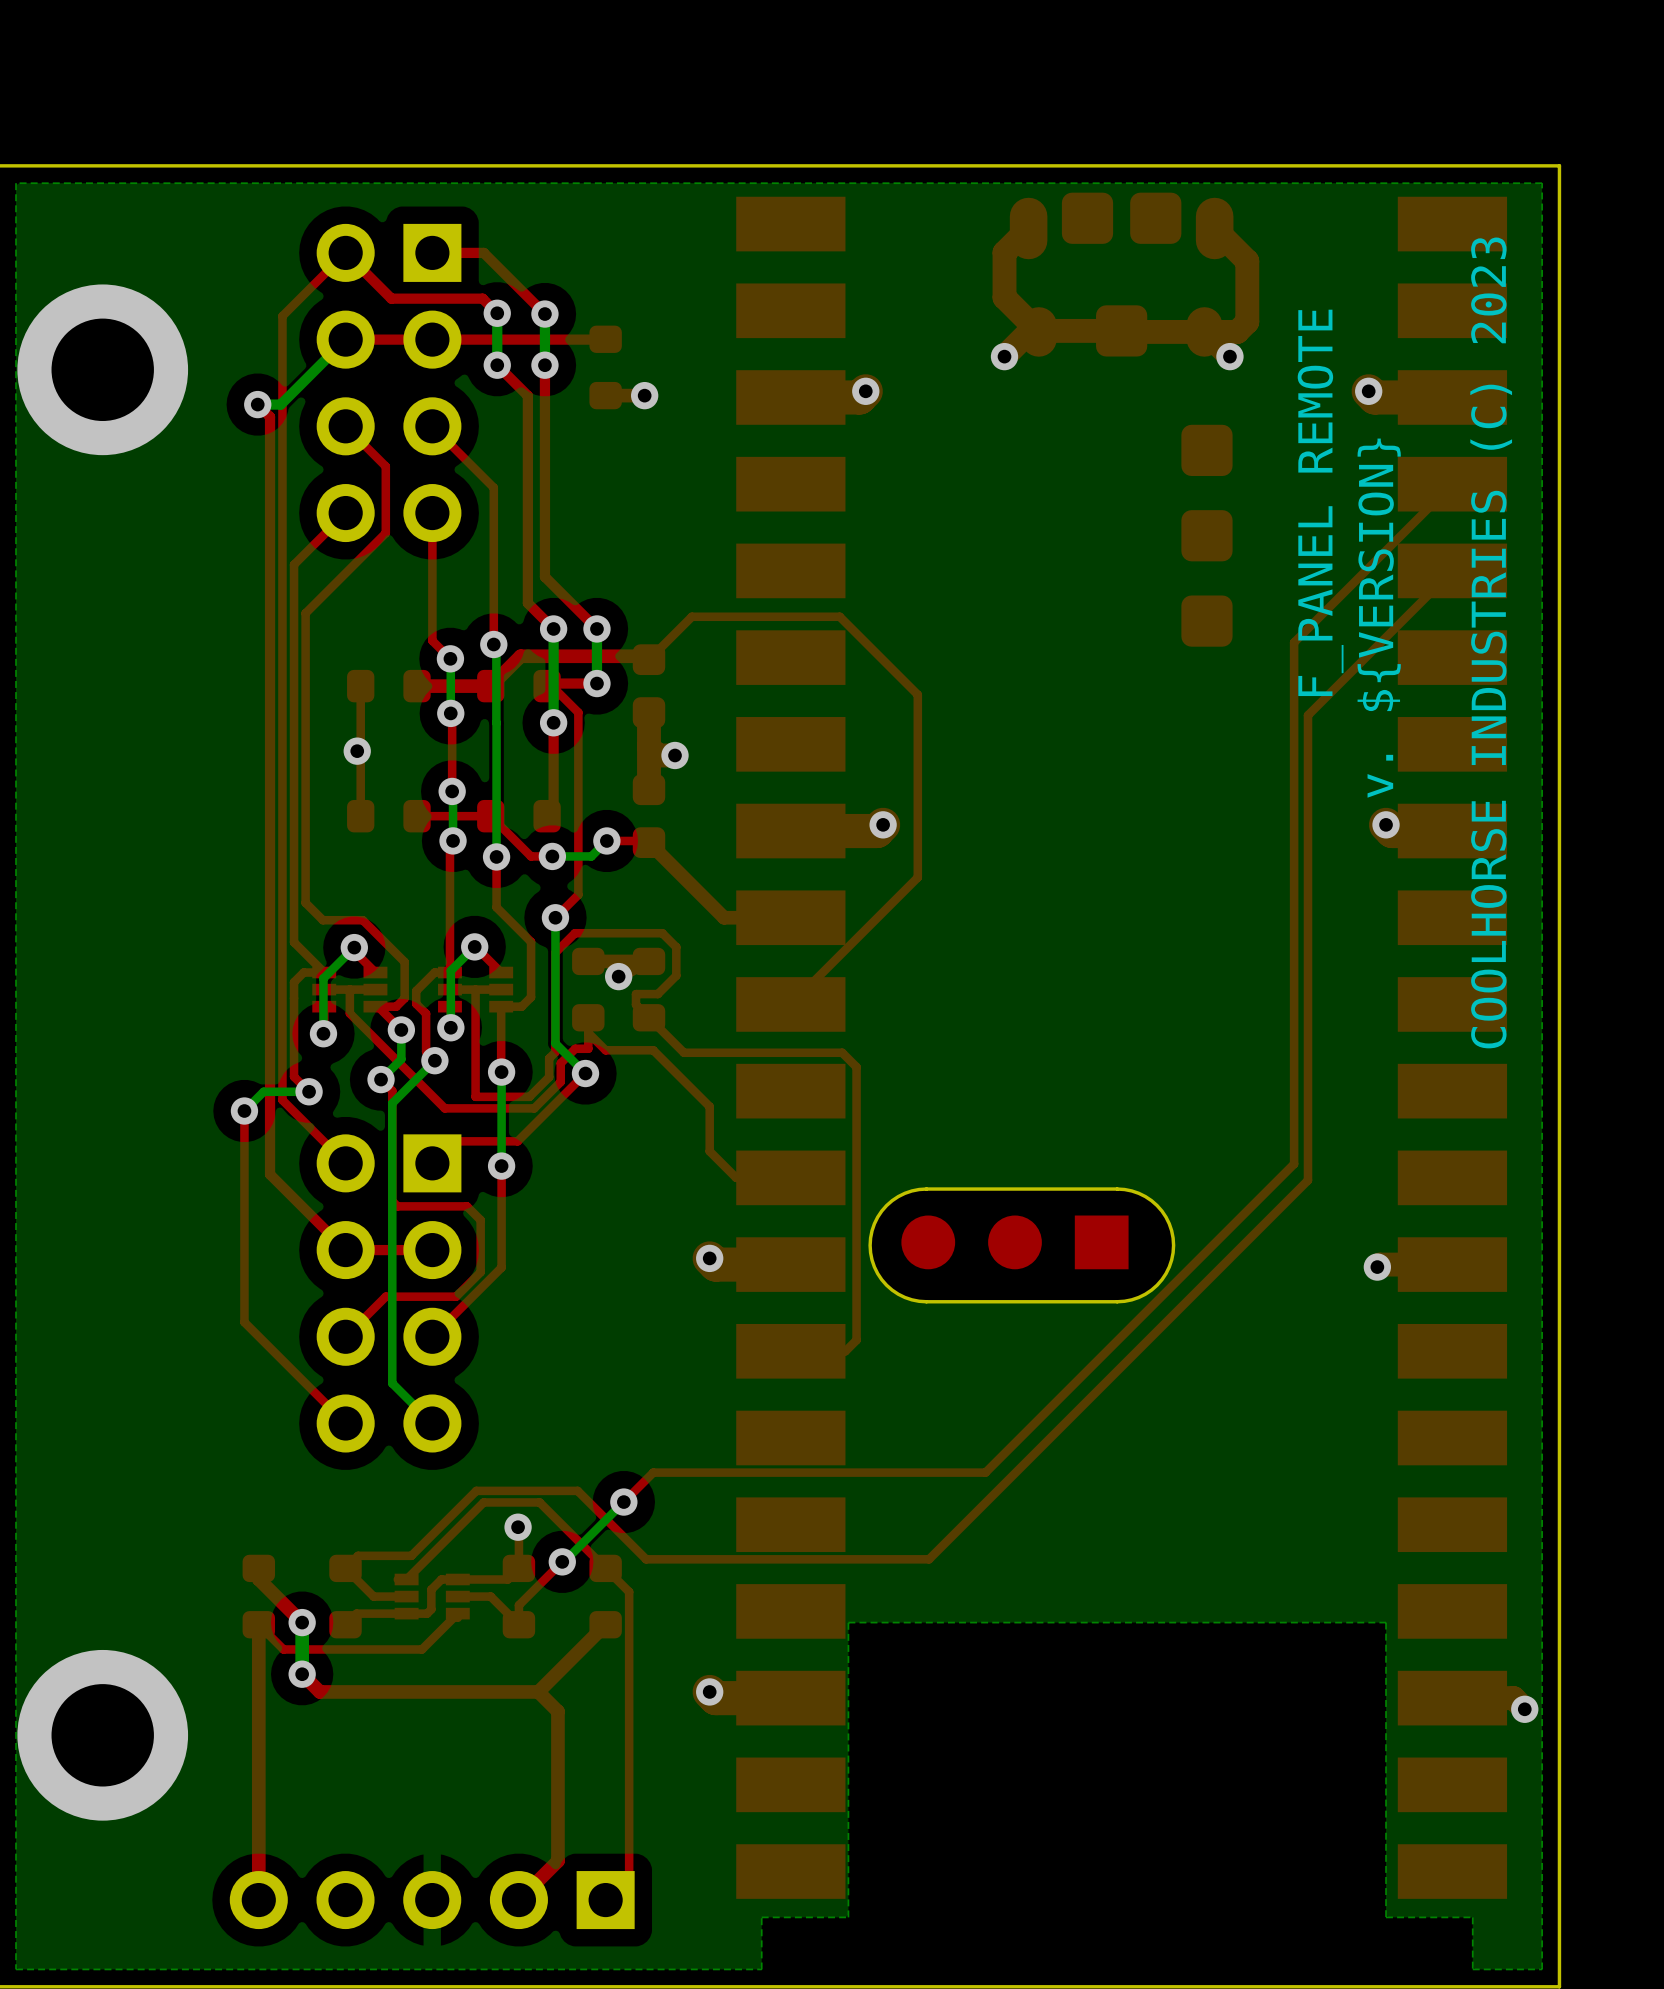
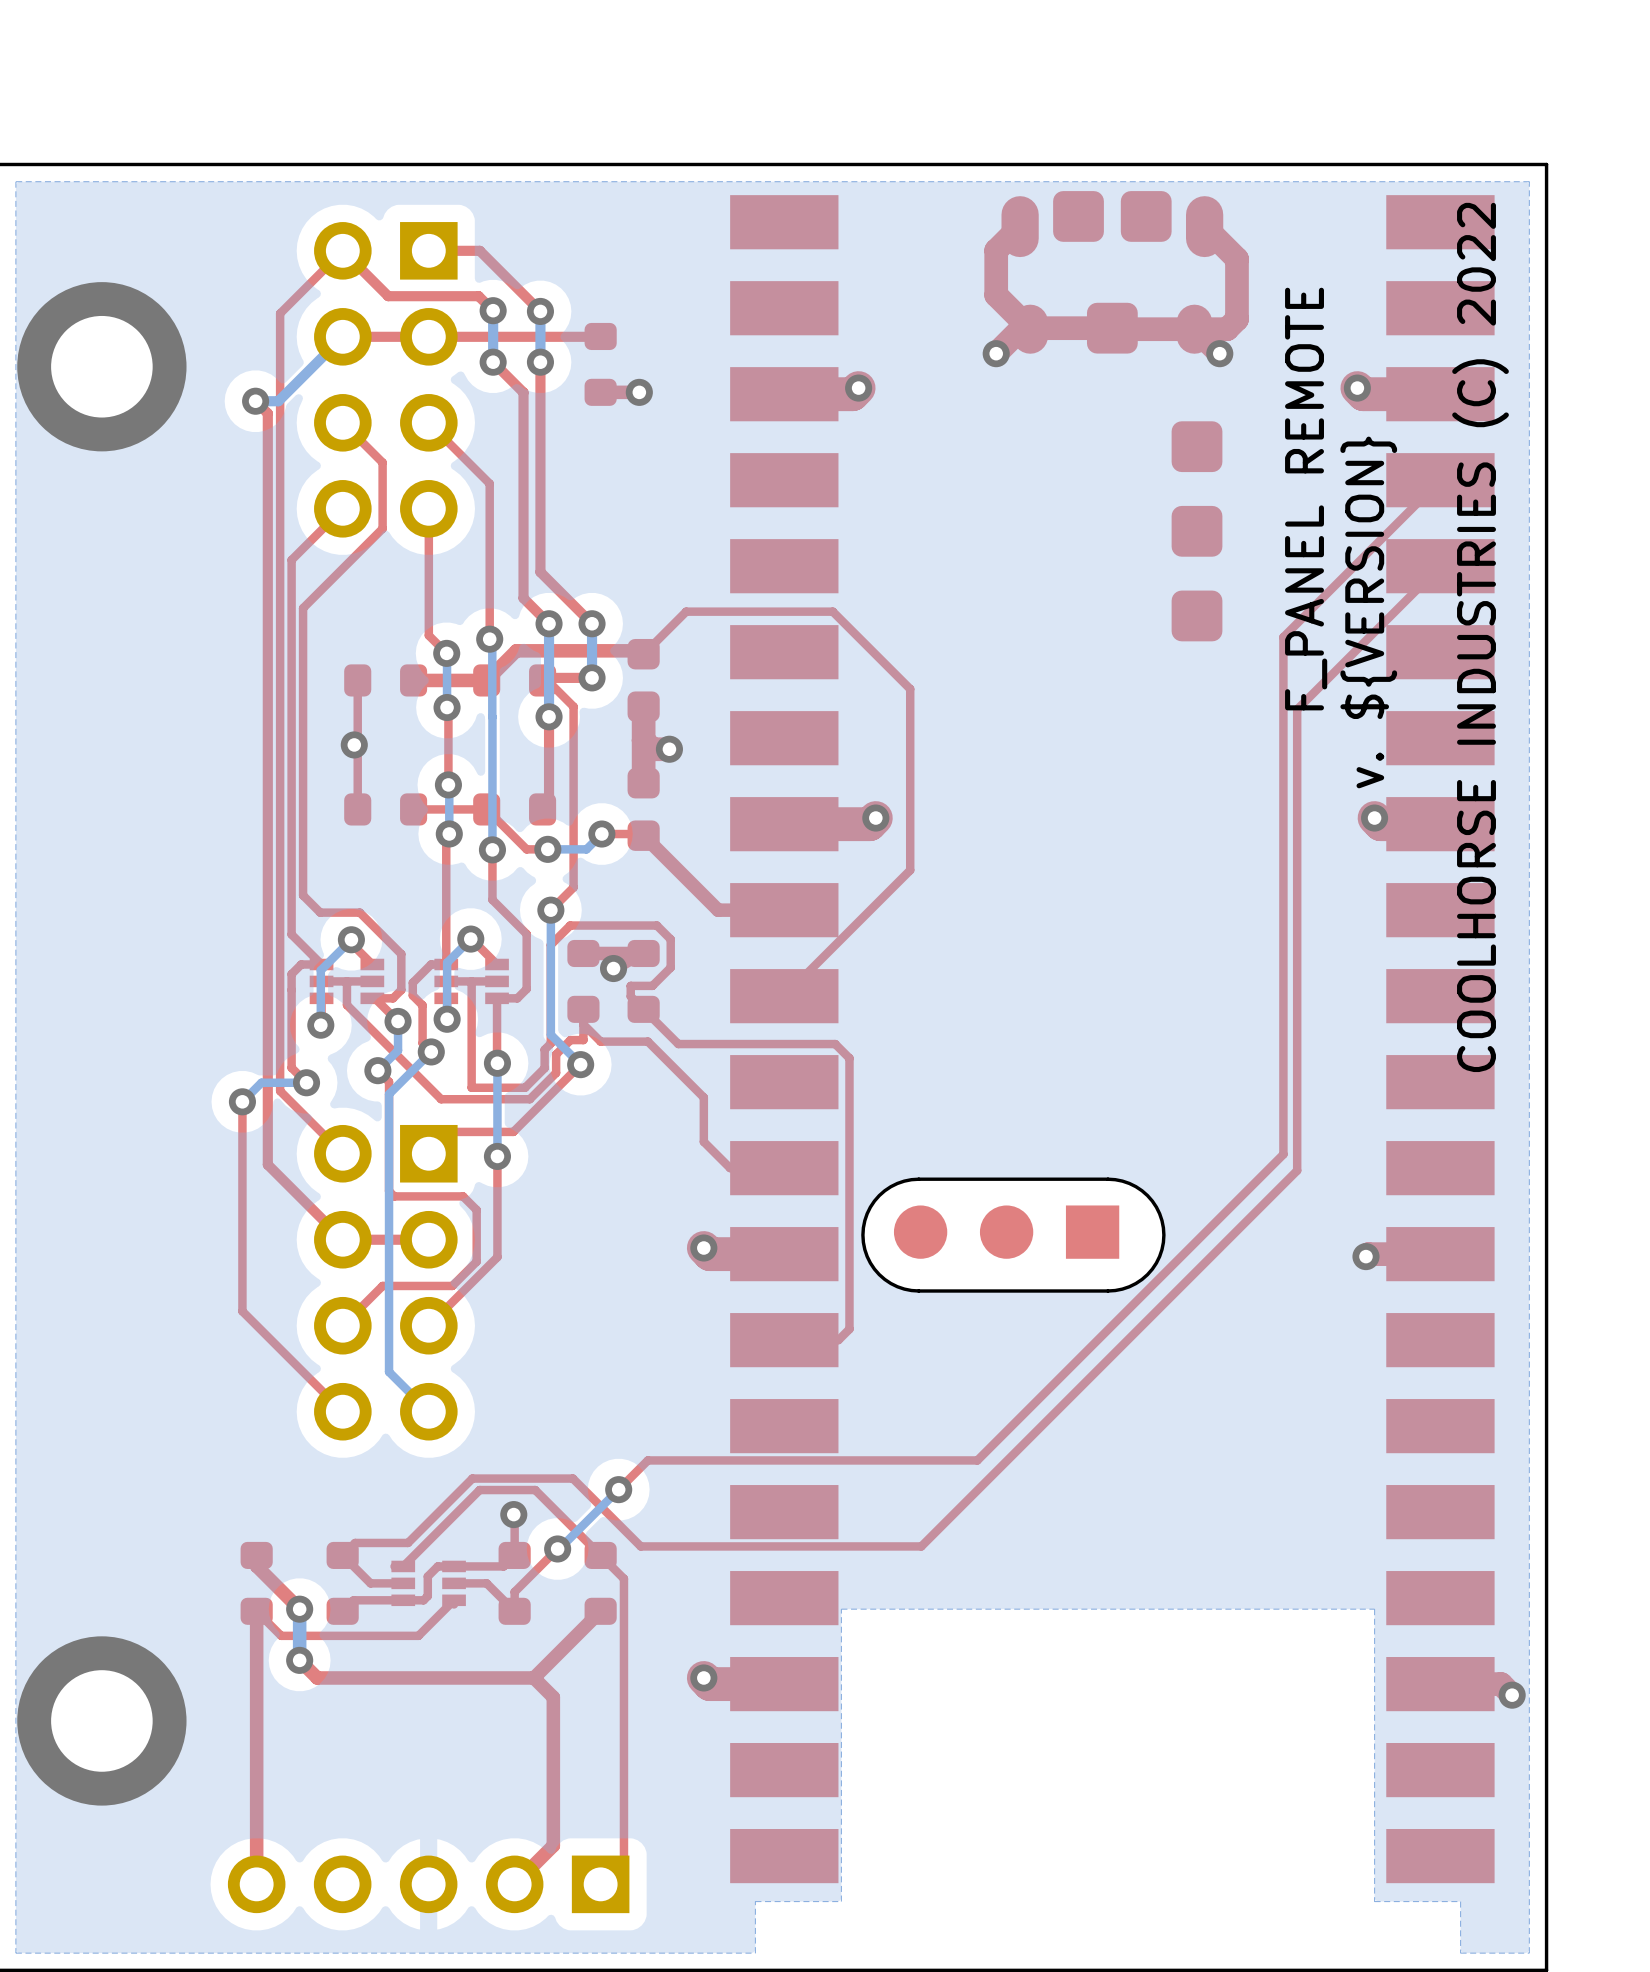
text: COOLHORSE INDUSTRIES (C) 2023 (1491, 642) -> COOLHORSE INDUSTRIES (C) 2022 (1480, 637)

